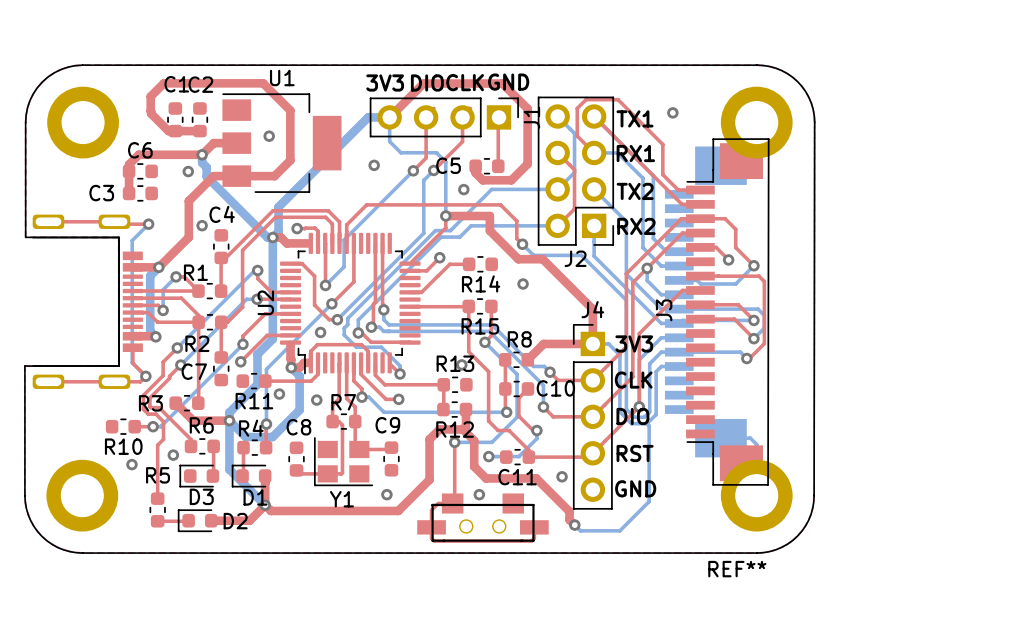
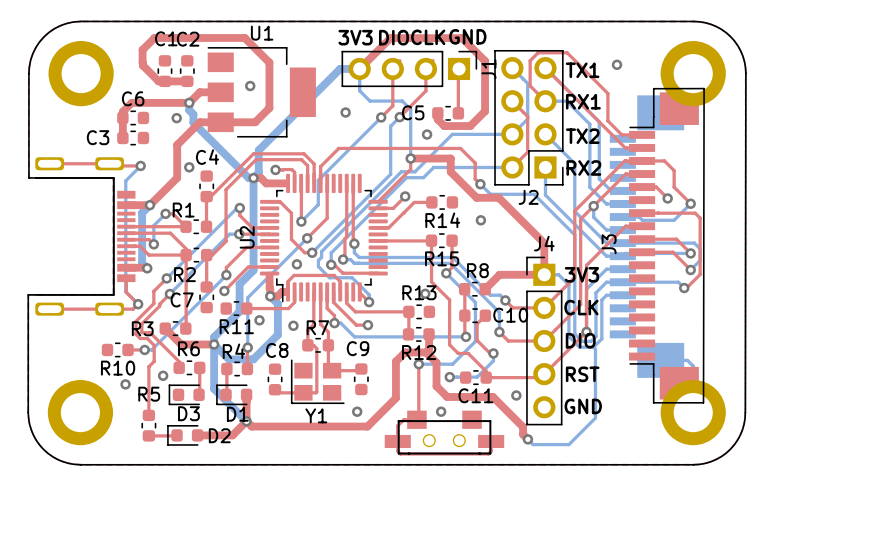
REF** name: REF** (737, 569) -> none

